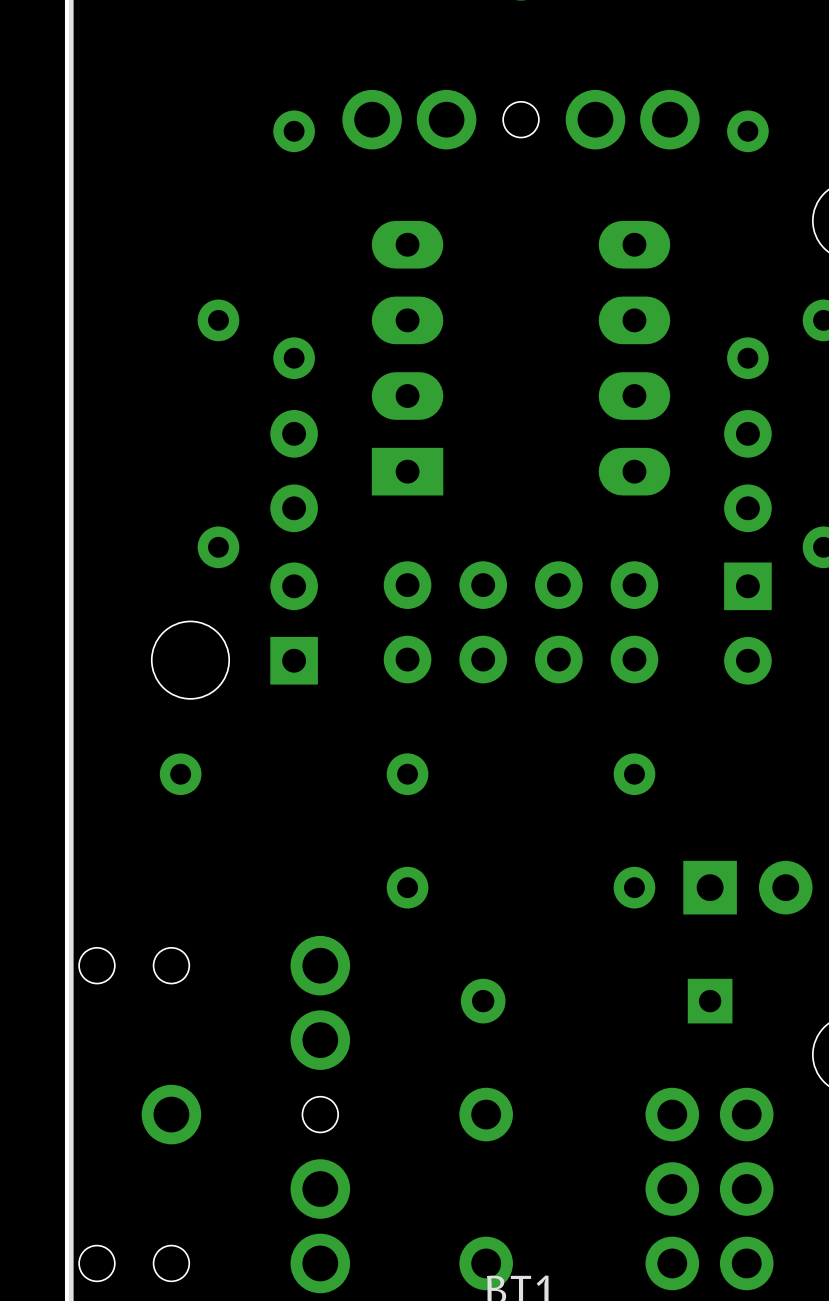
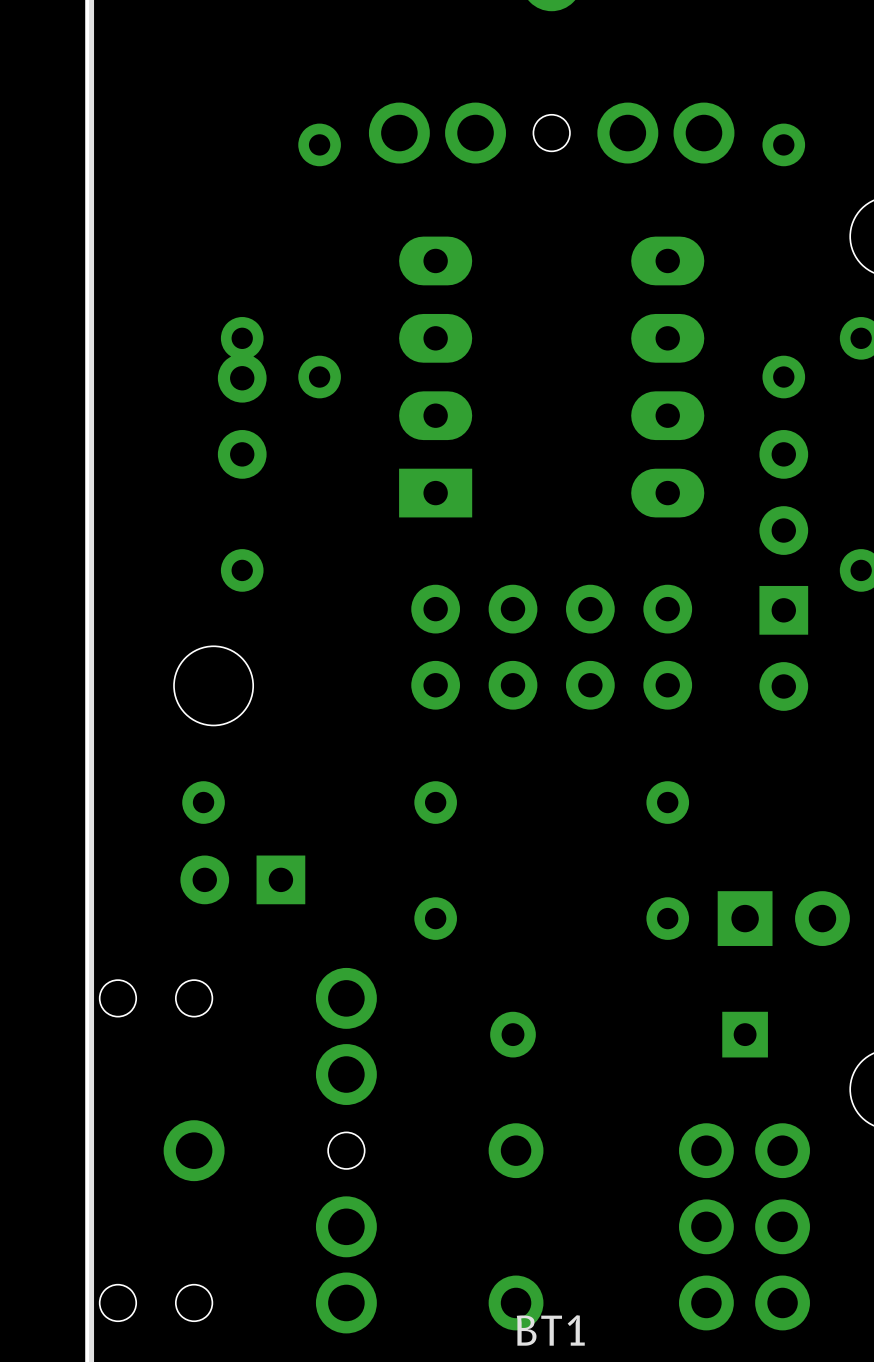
part position: (294, 471) -> (242, 416)
part rotation: 0° (294, 623) -> 90° counterclockwise (242, 879)
part position: (294, 623) -> (242, 879)

